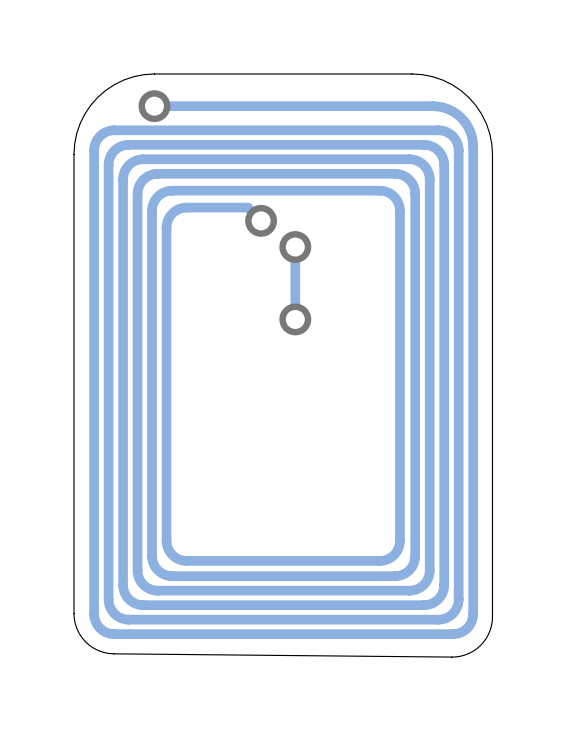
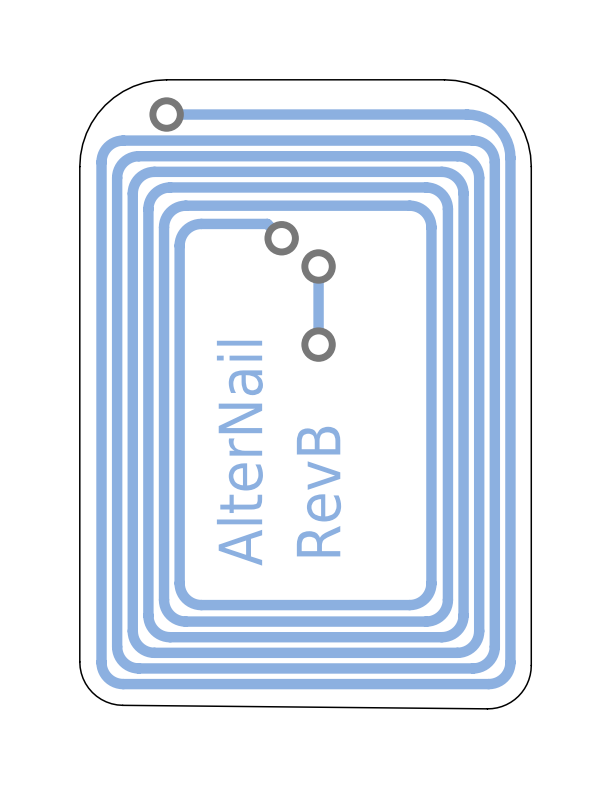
text: none -> AlterNail (239, 453)
text: none -> RevB (318, 491)

